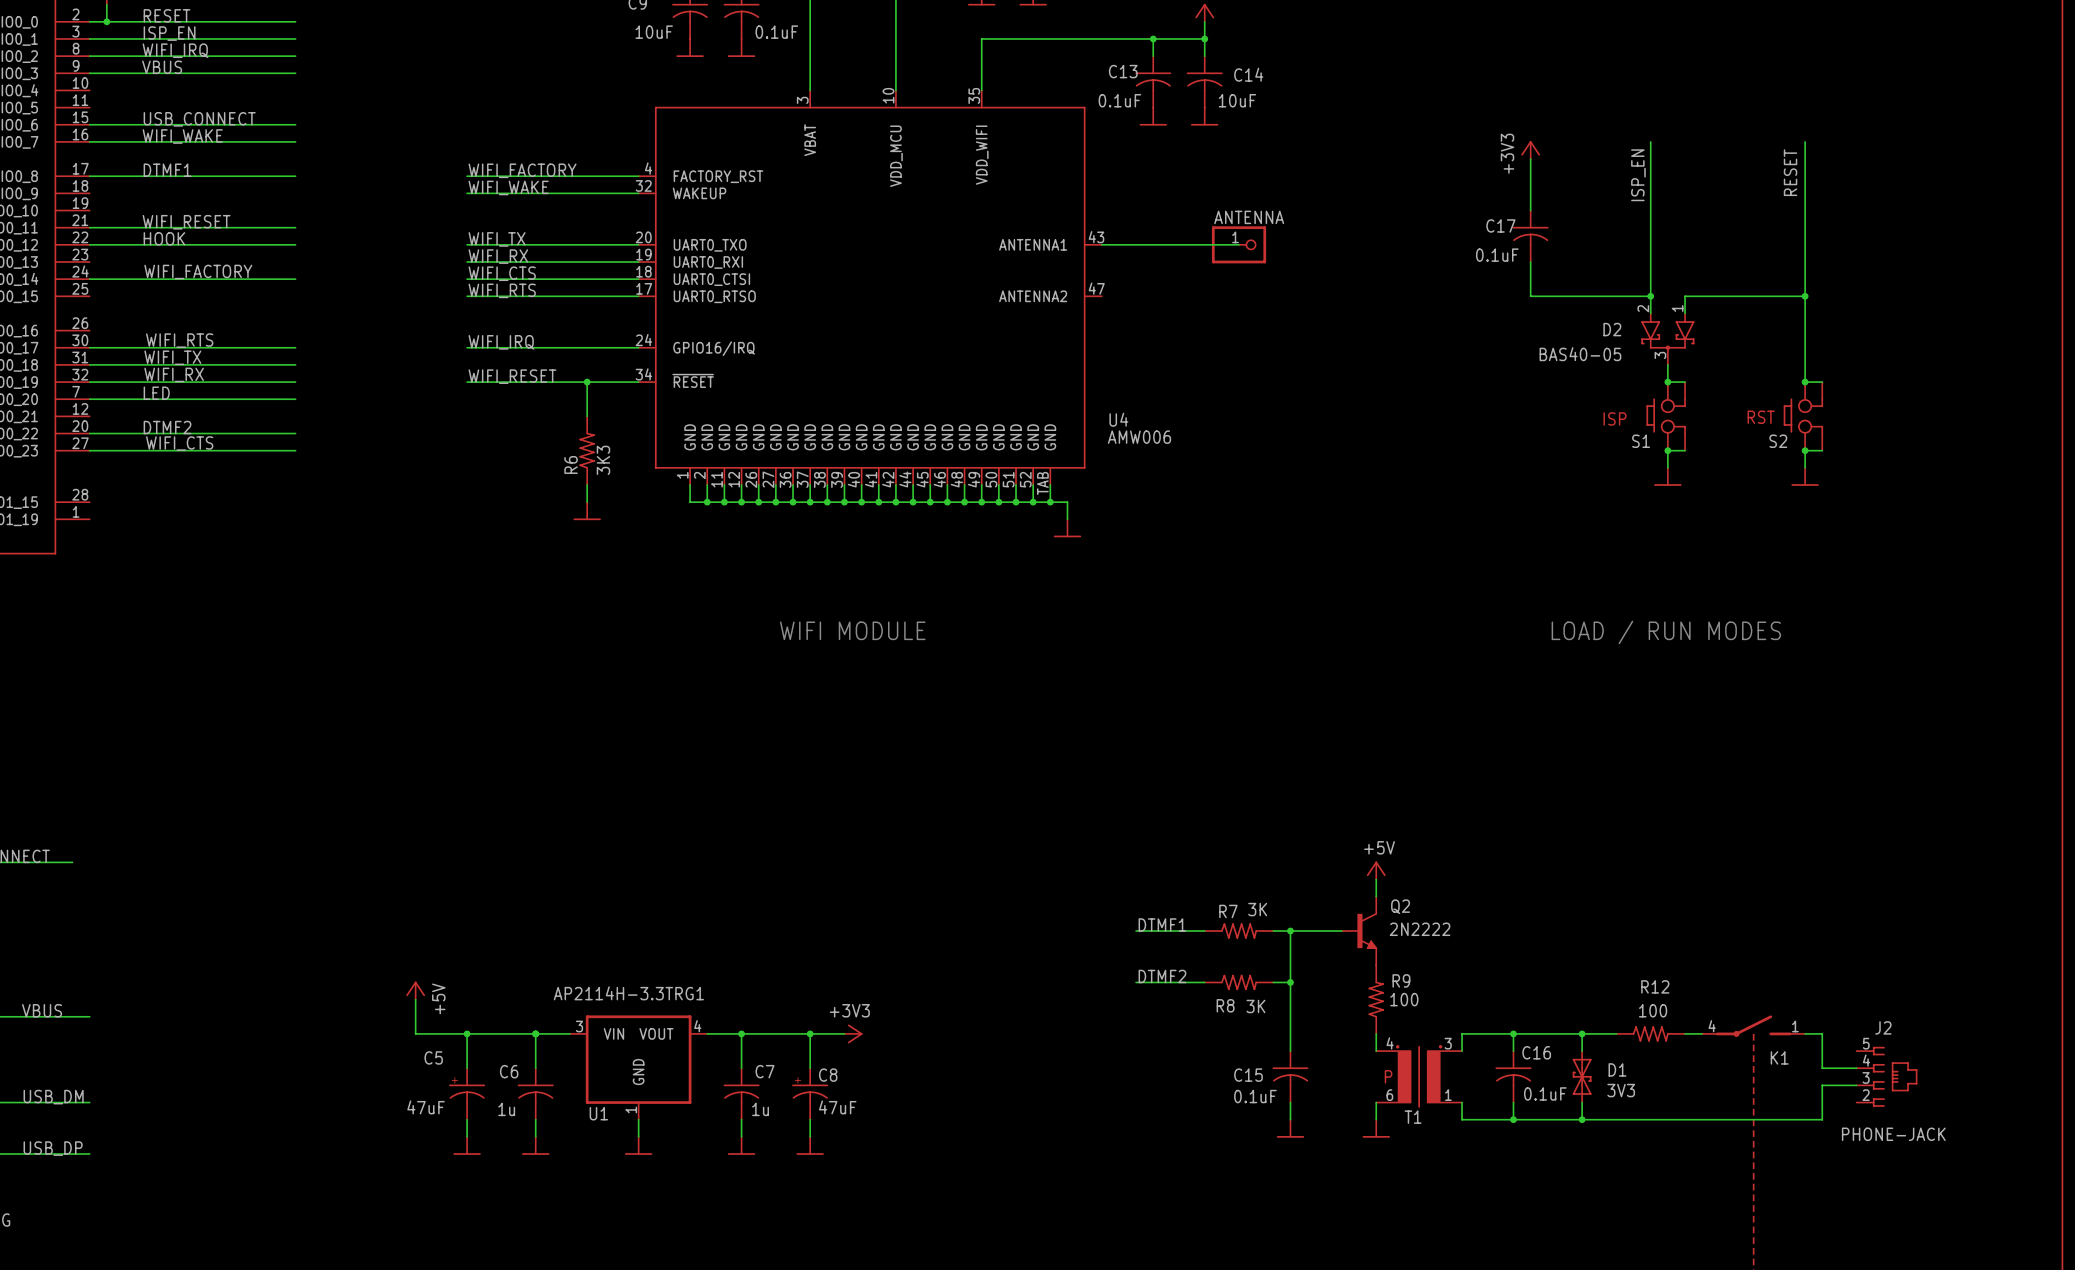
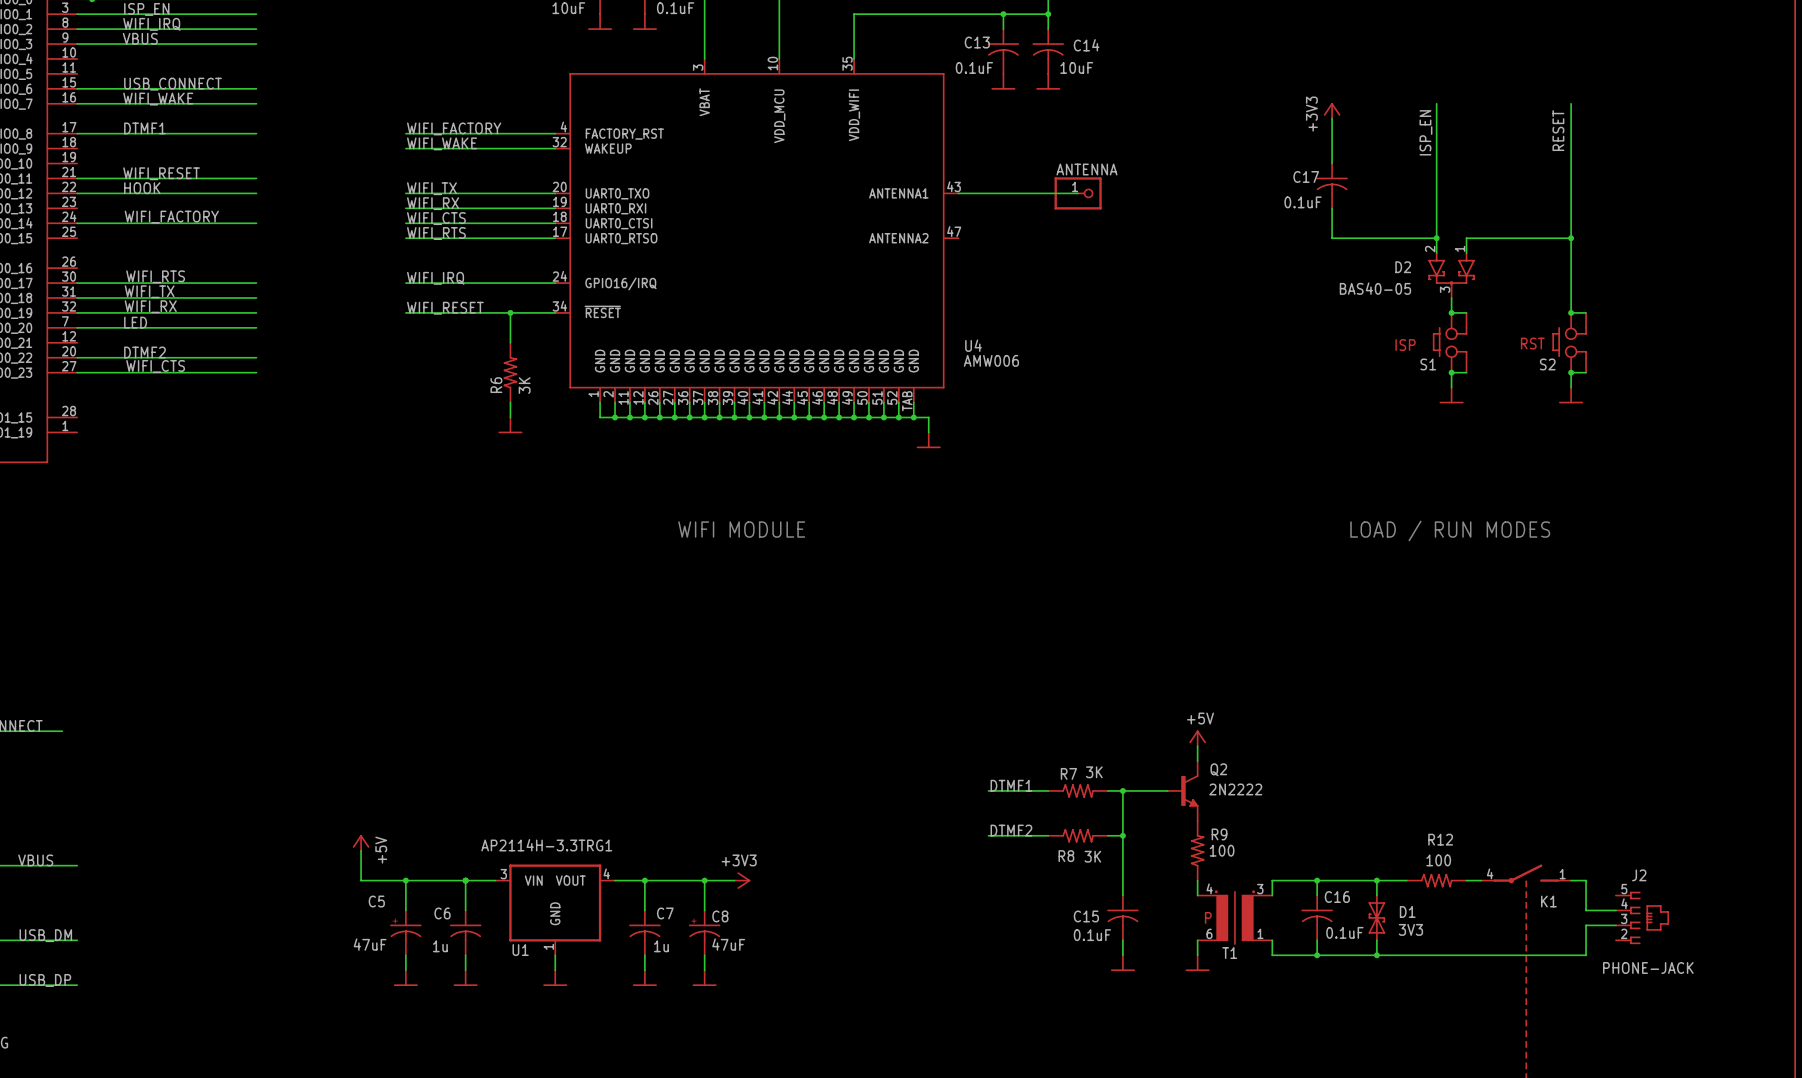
R6 value: 3K3 (603, 460) -> 3K (524, 385)

